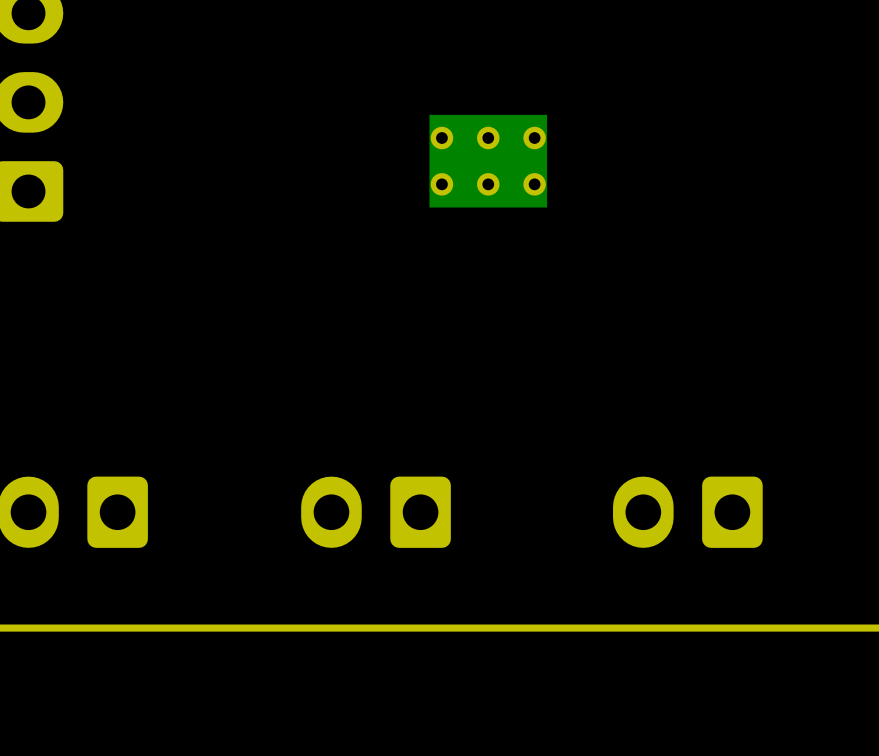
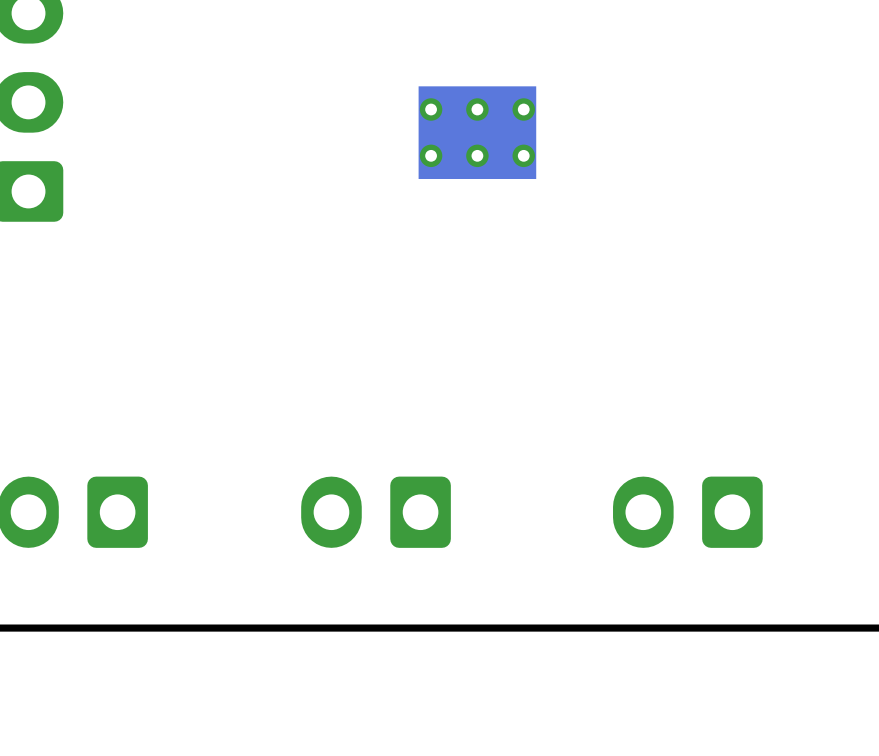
part position: (488, 161) -> (477, 132)

